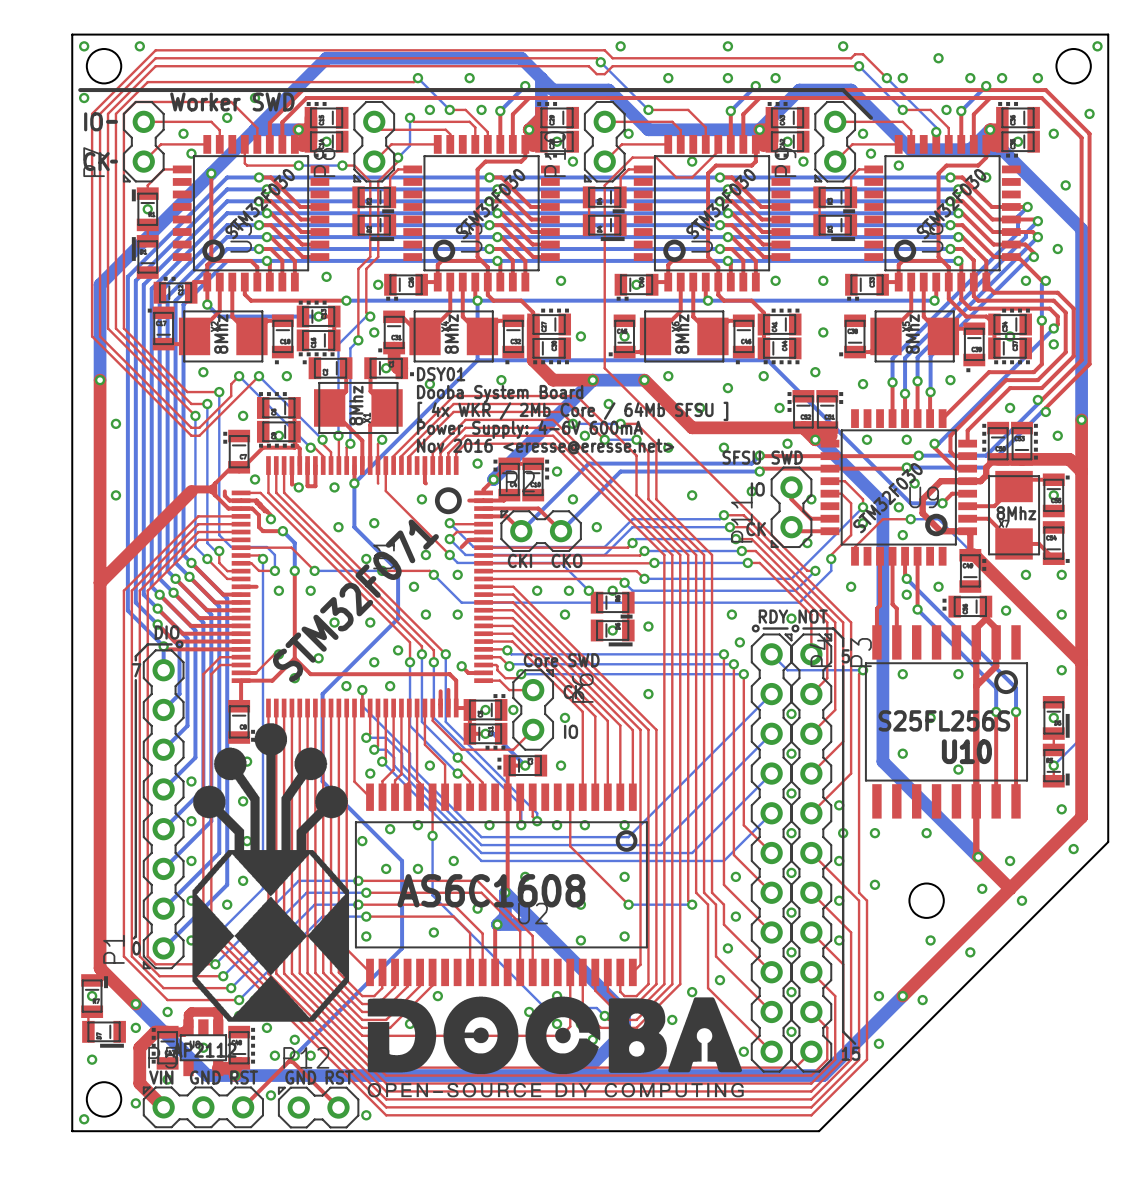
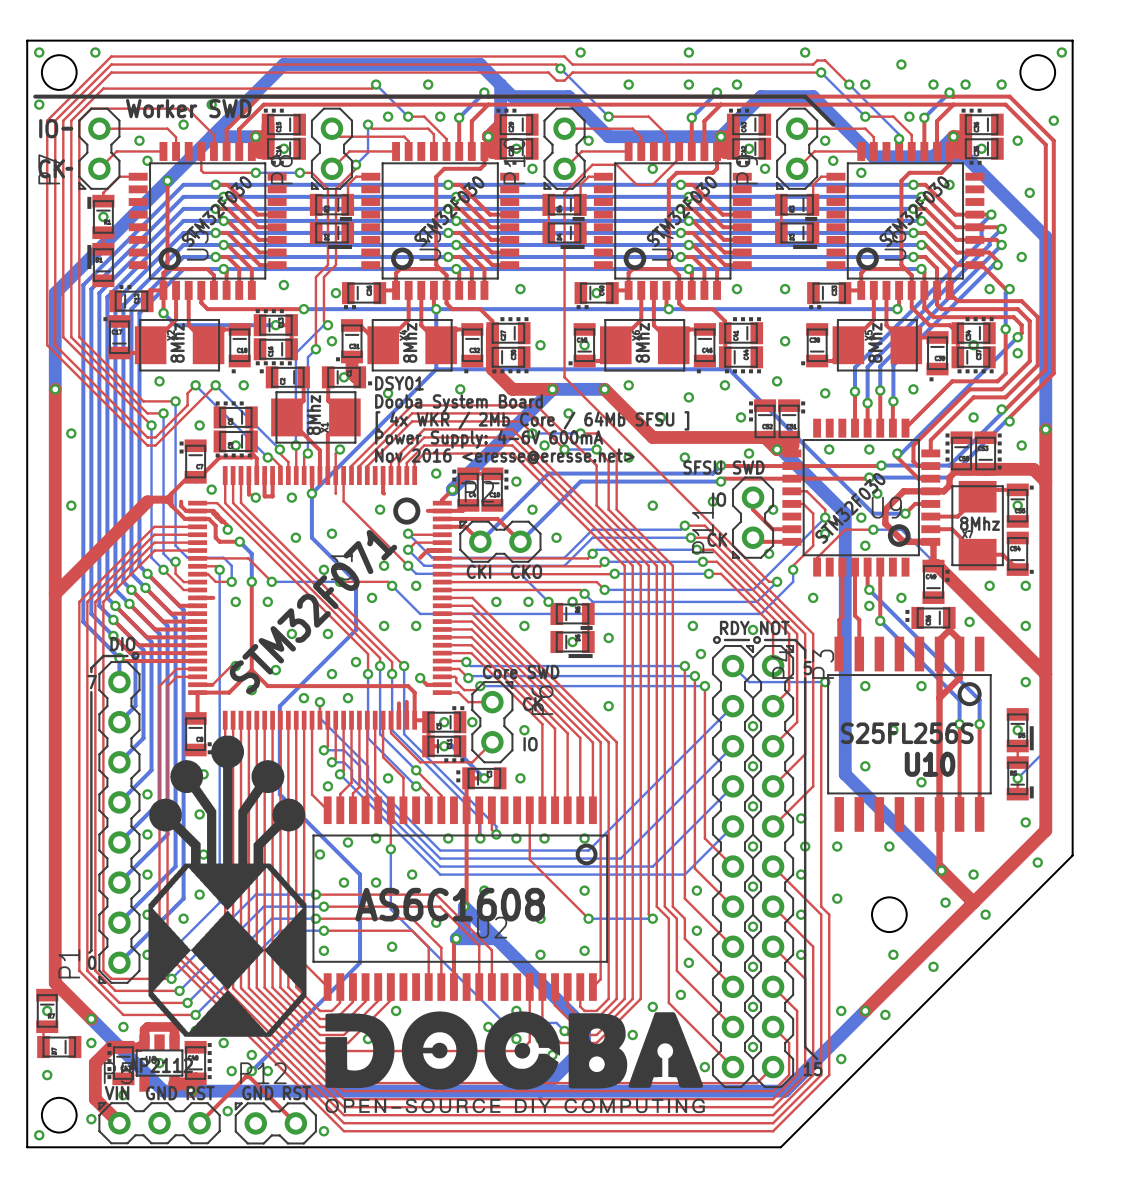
drawing: [104, 976, 109, 989] -> none
drawing: [100, 1043, 124, 1048] -> none

